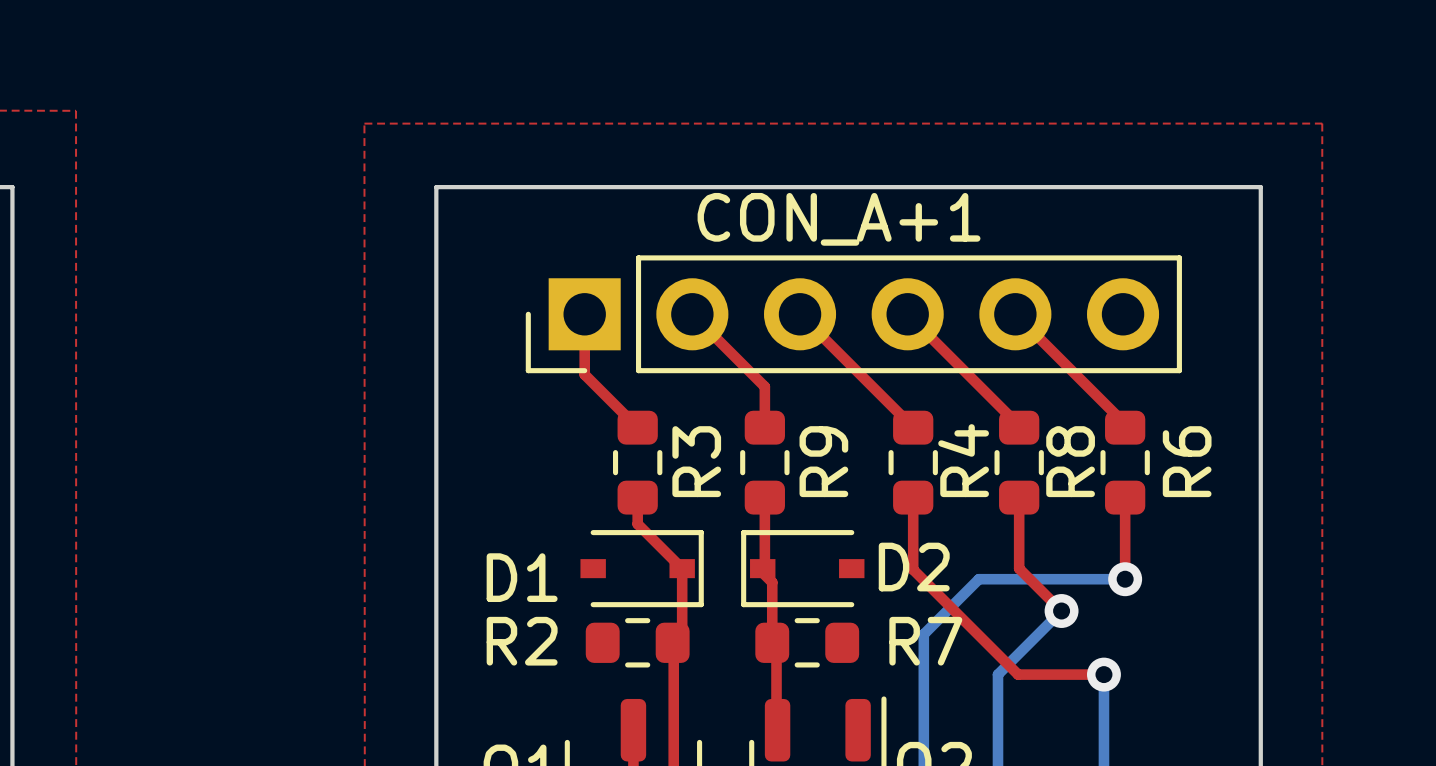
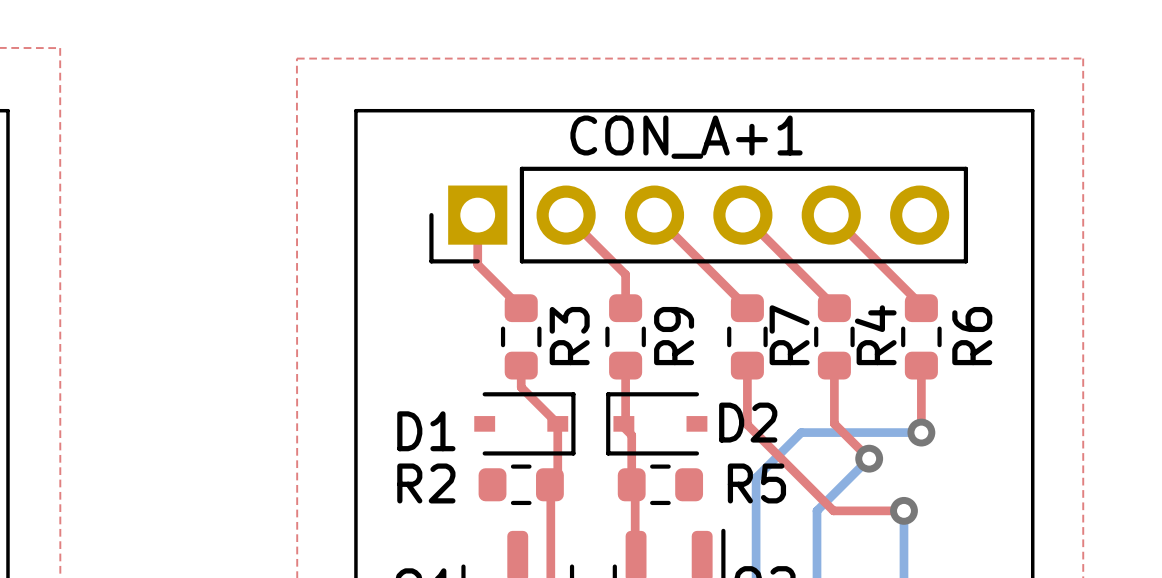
R4 name: R4 (963, 460) -> R7 (789, 335)
R8 name: R8 (1070, 461) -> R4 (875, 335)
R7 name: R7 (925, 641) -> R5 (756, 483)

